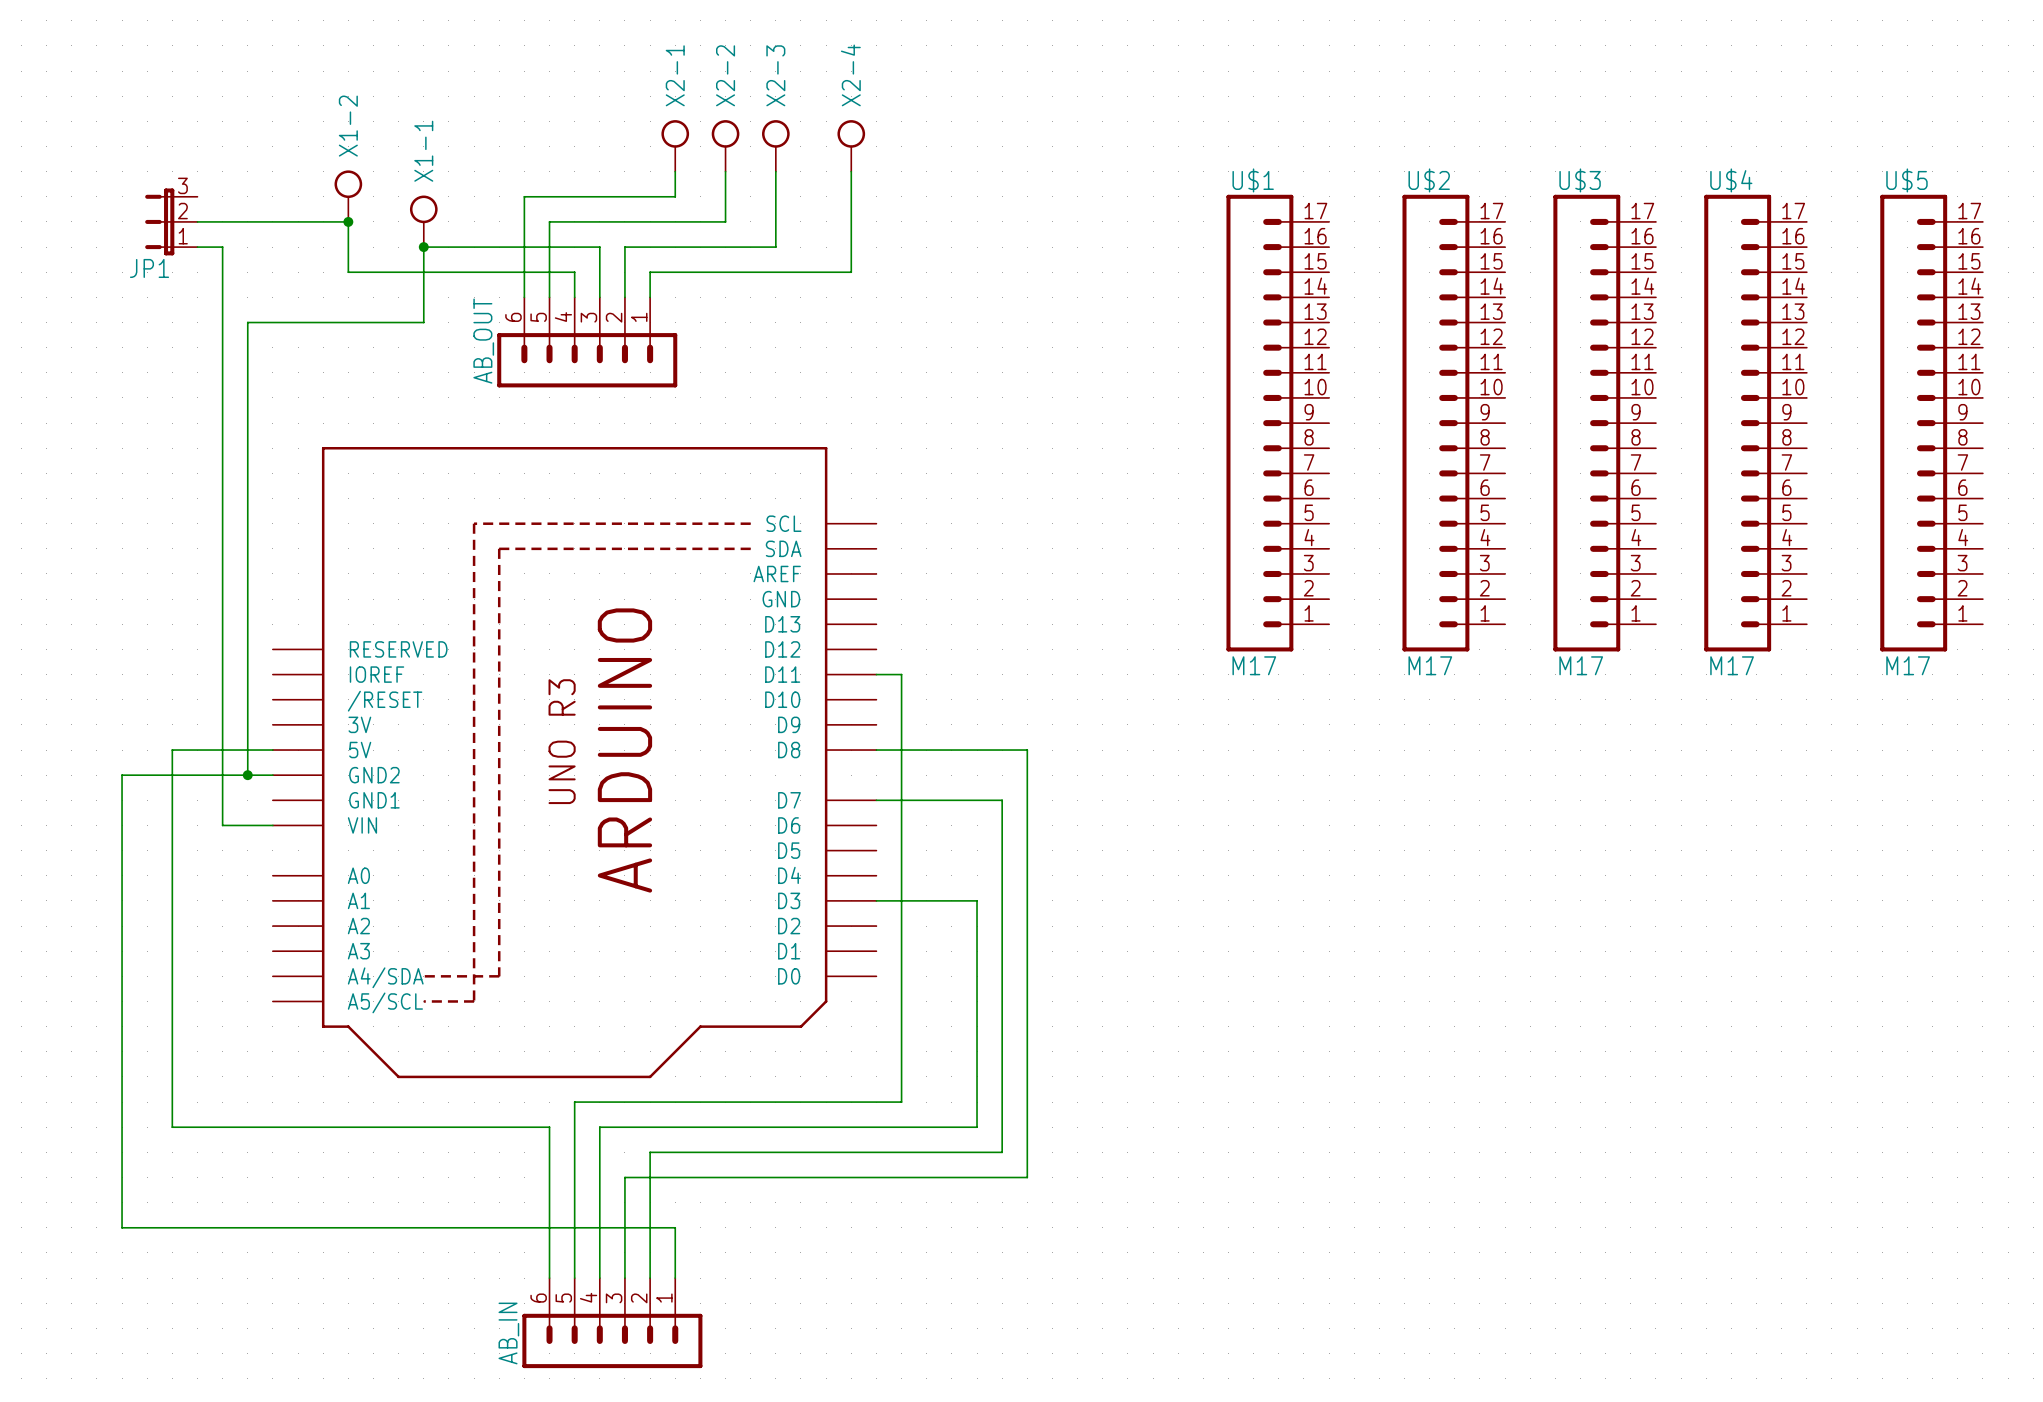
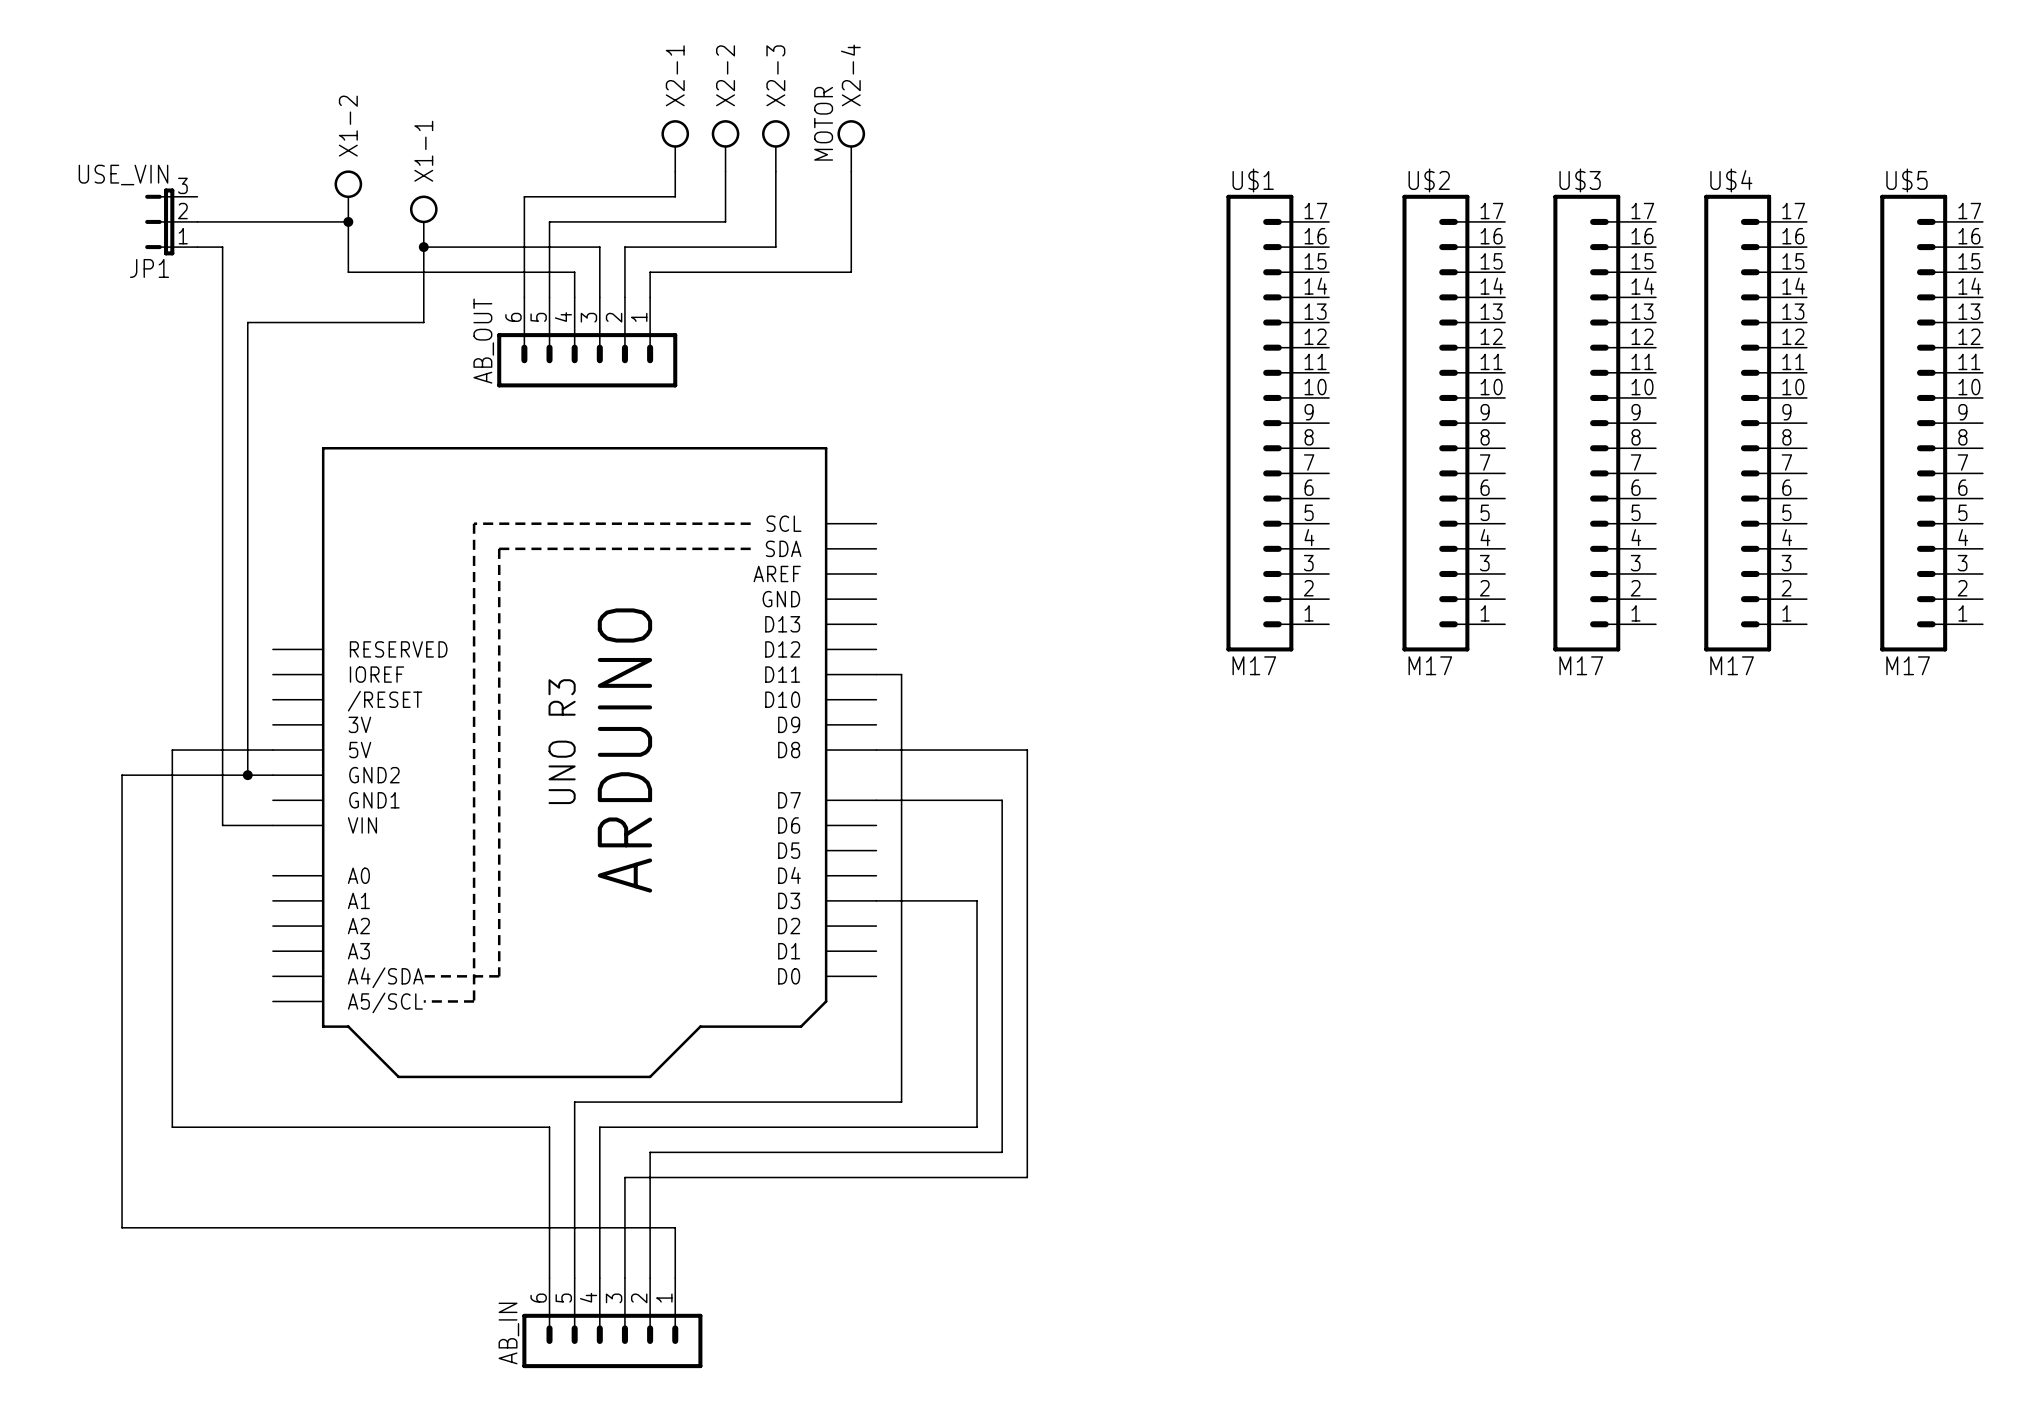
X2-4 value: none -> MOTOR (823, 123)
JP1 value: none -> USE_VIN (123, 175)

